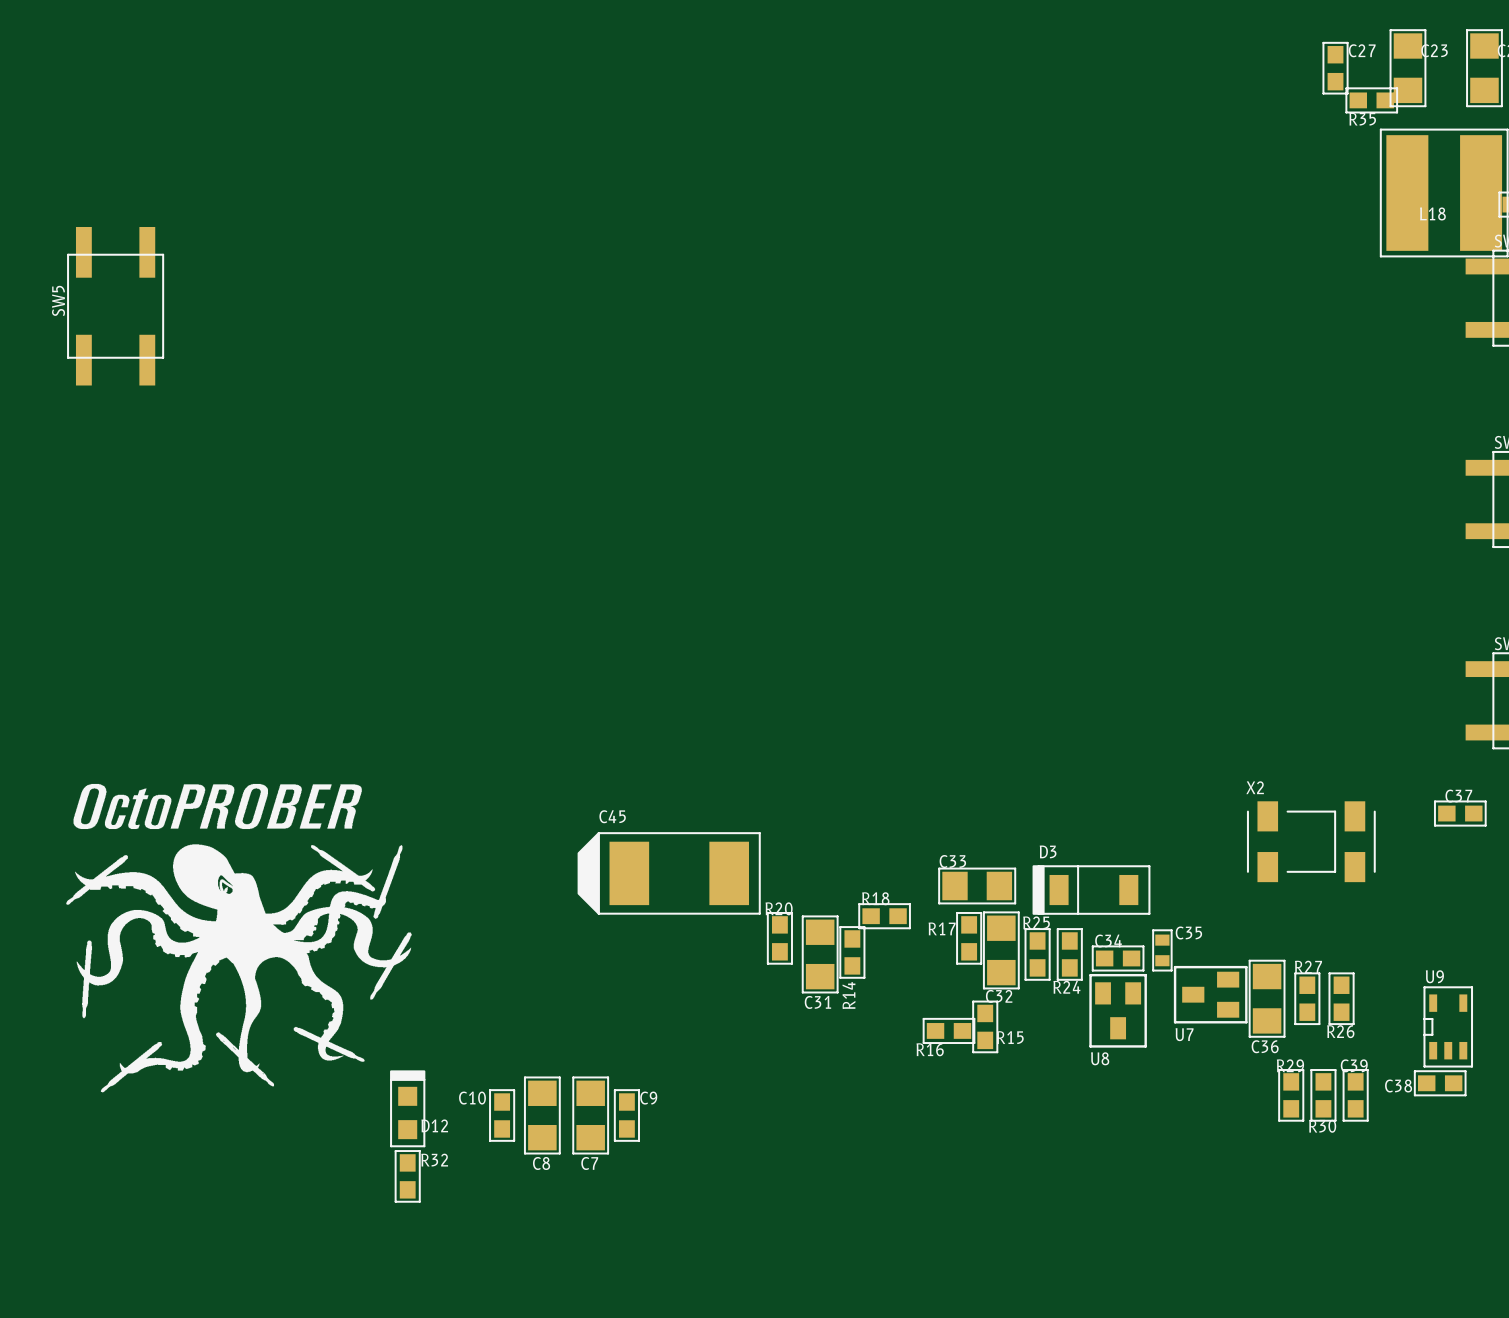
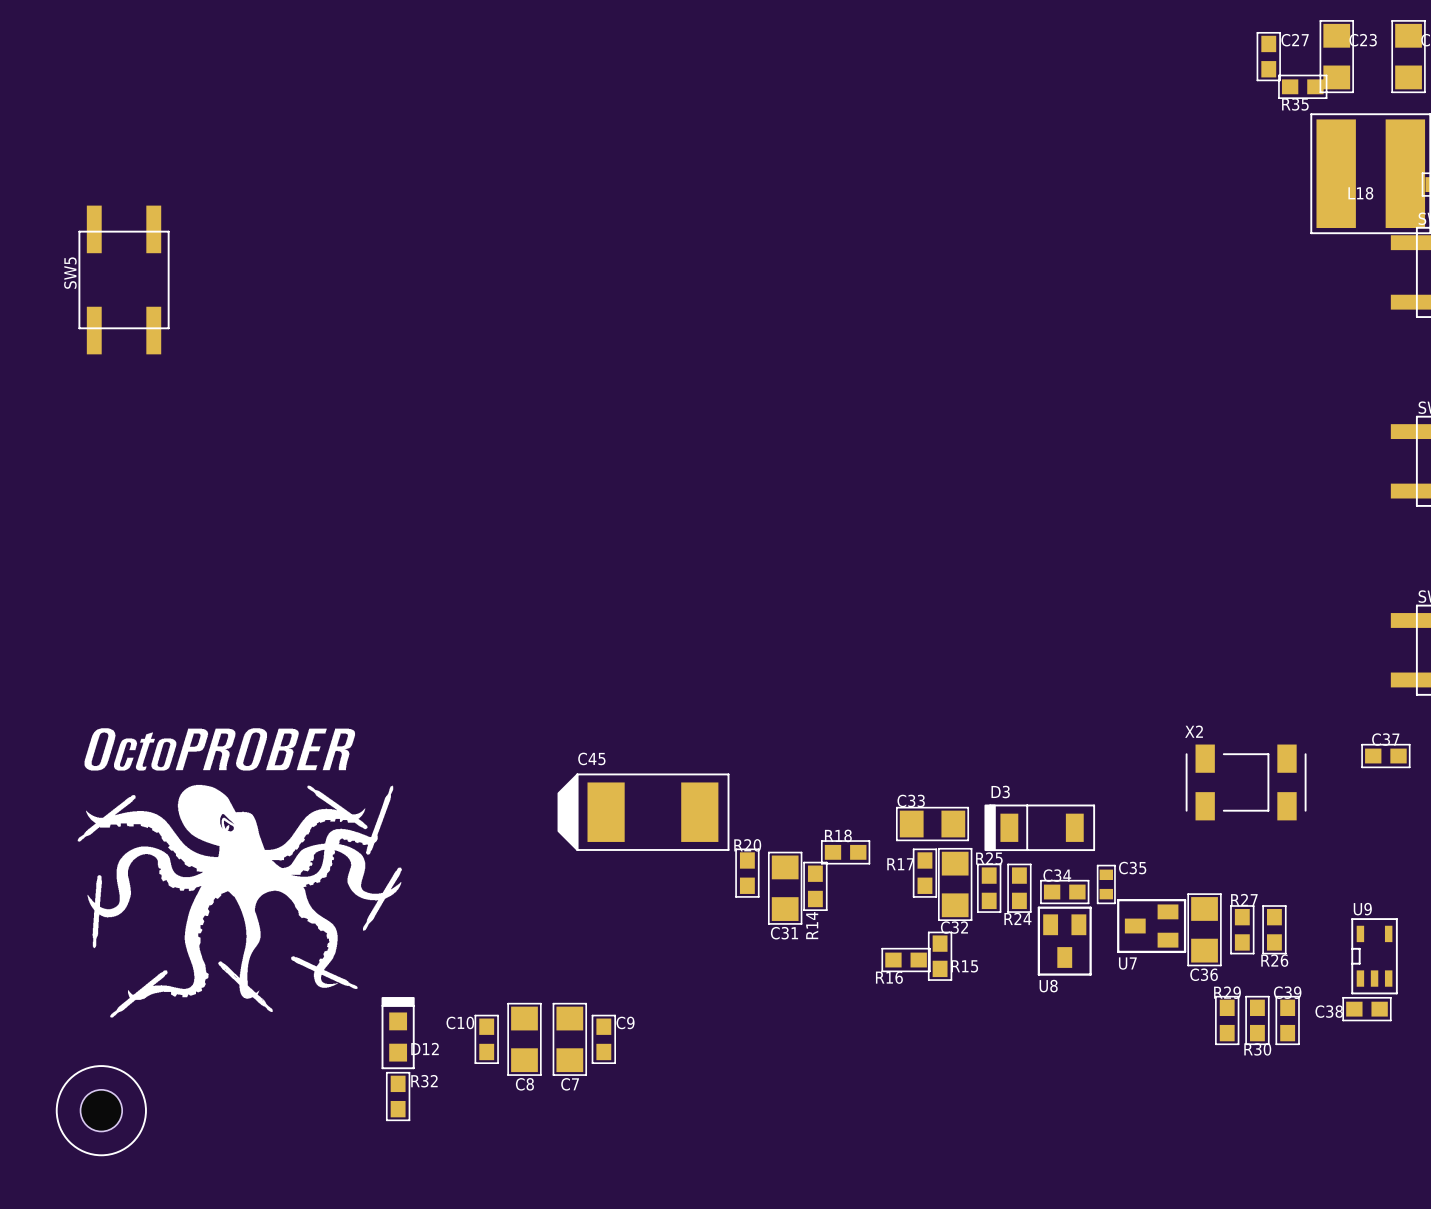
part: none -> (101, 1110)

